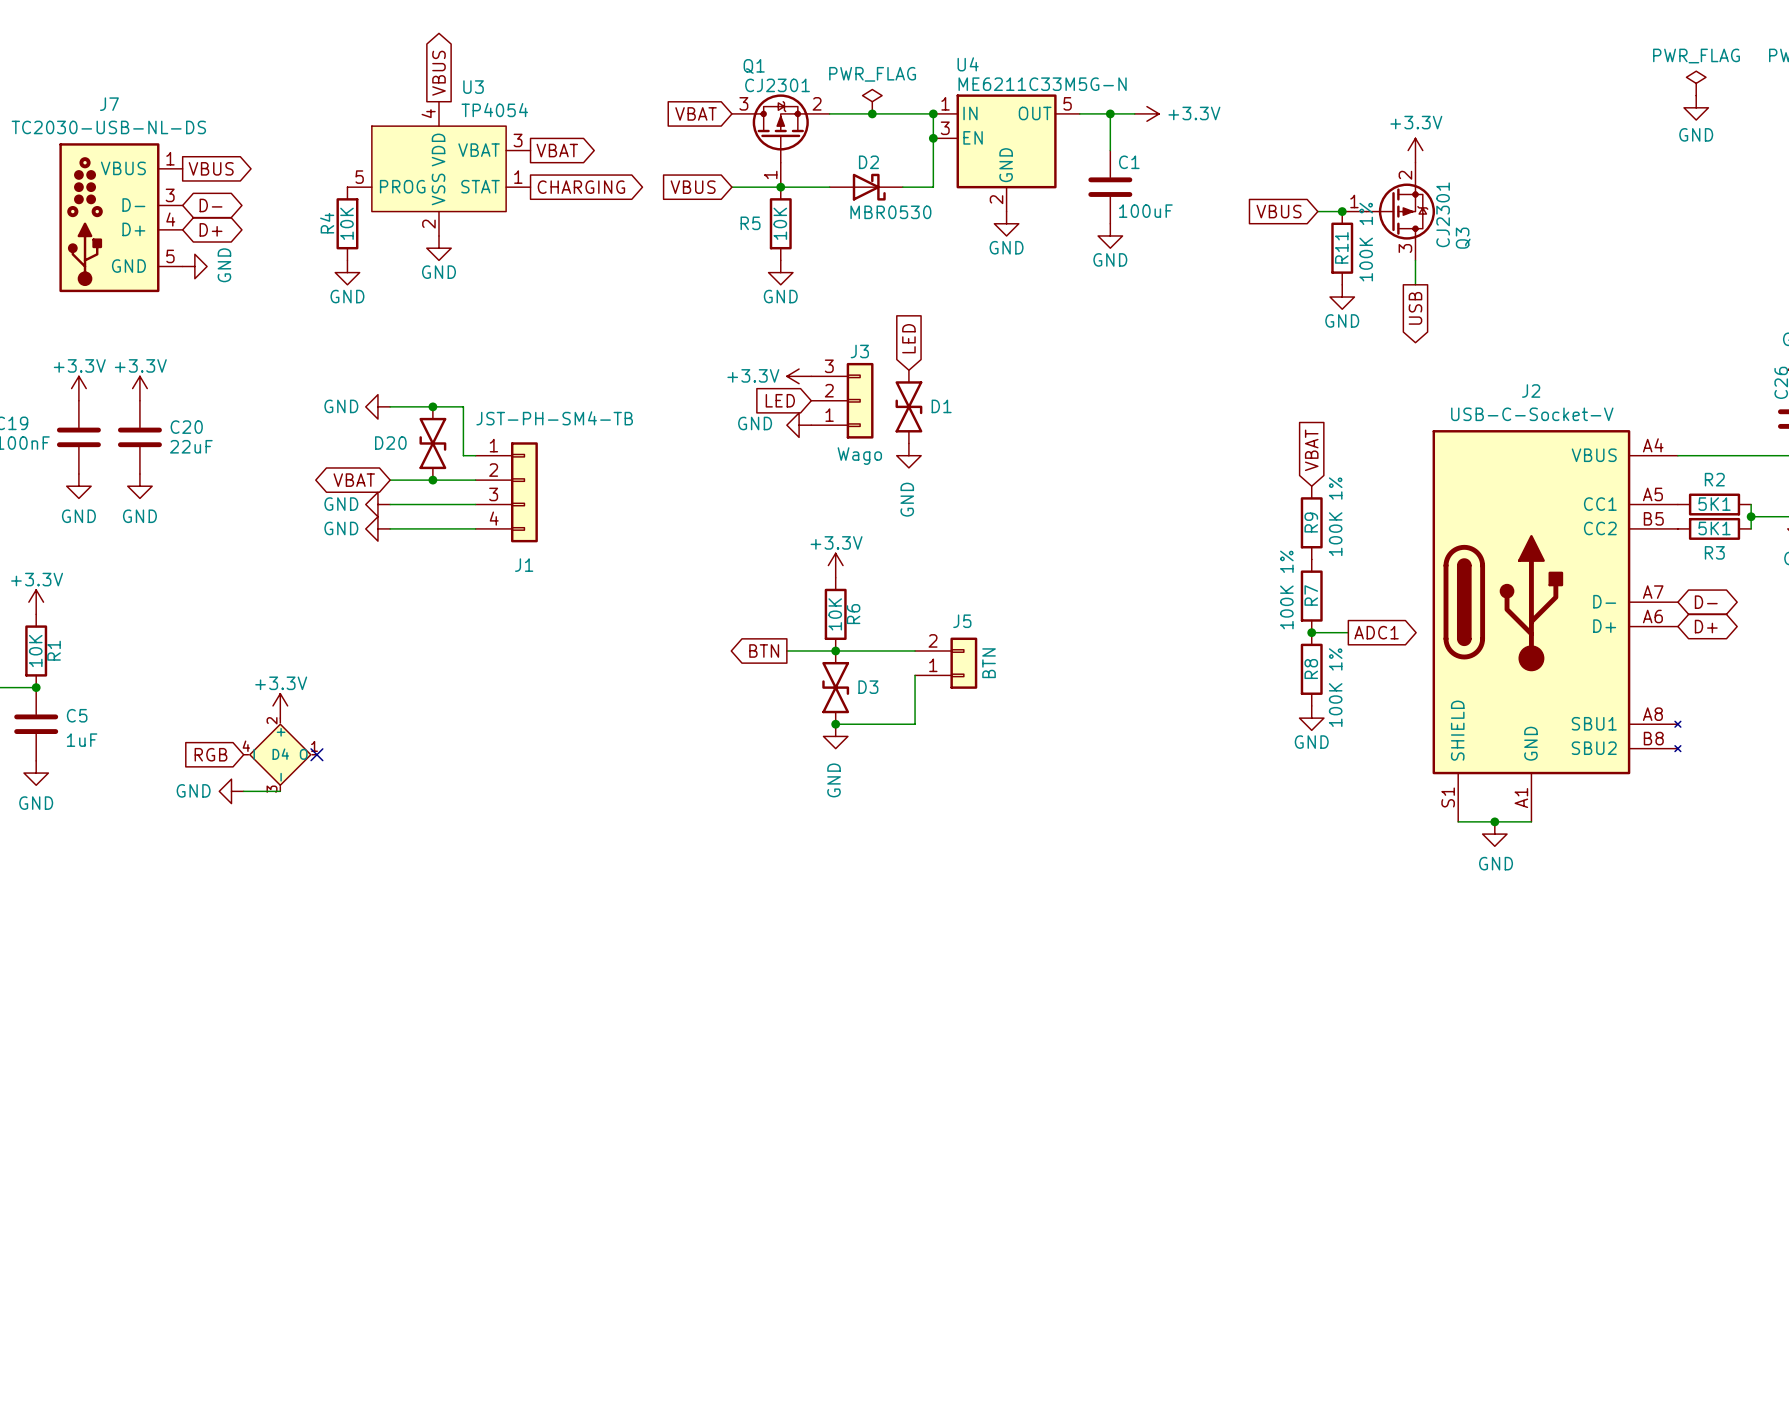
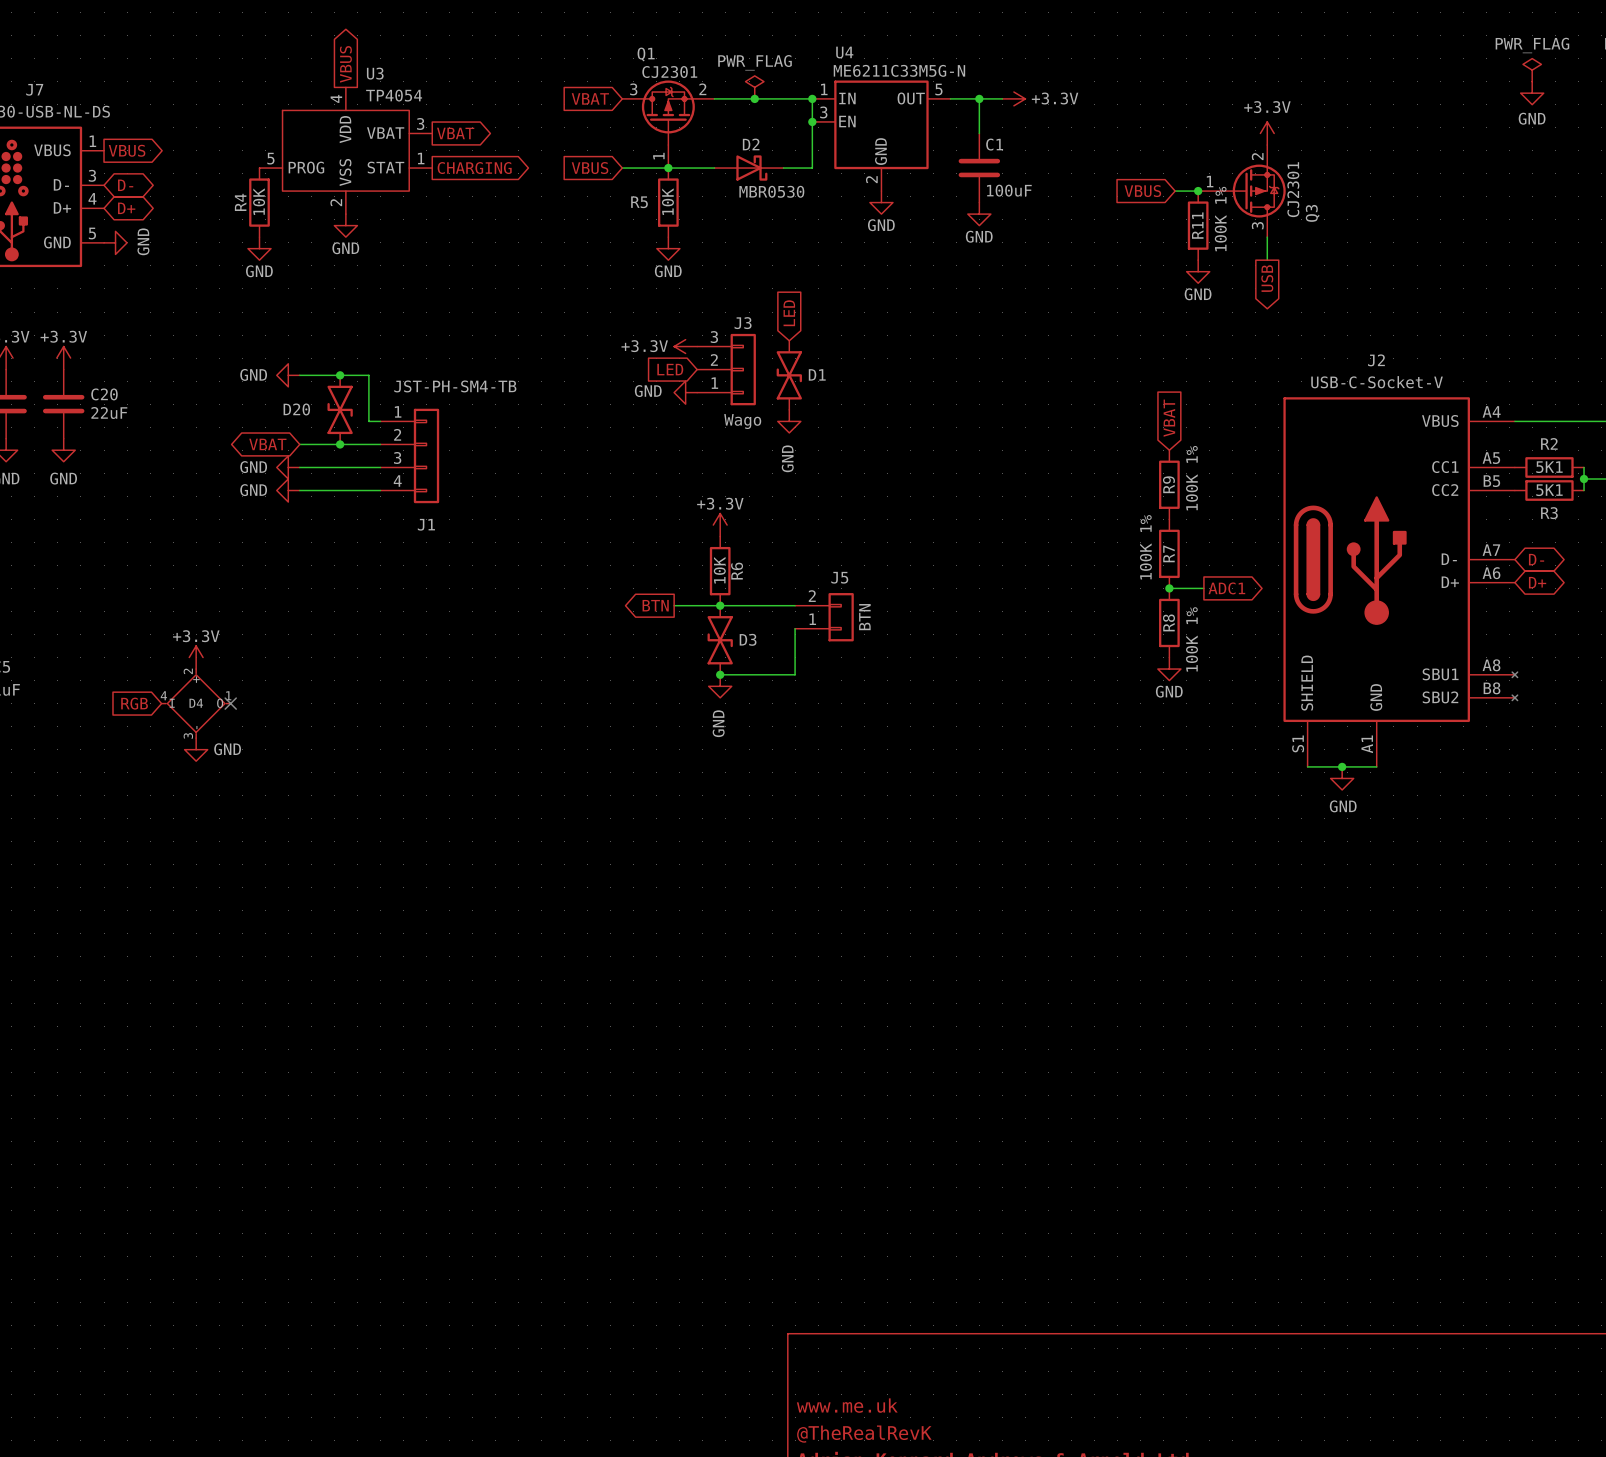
power symbol text position: GND (193, 790) -> GND (227, 749)
power symbol rotation: 0° (231, 791) -> 90° counterclockwise (196, 749)
power symbol position: GND (231, 791) -> GND (196, 749)
wire: (243, 791) (280, 791) -> none

